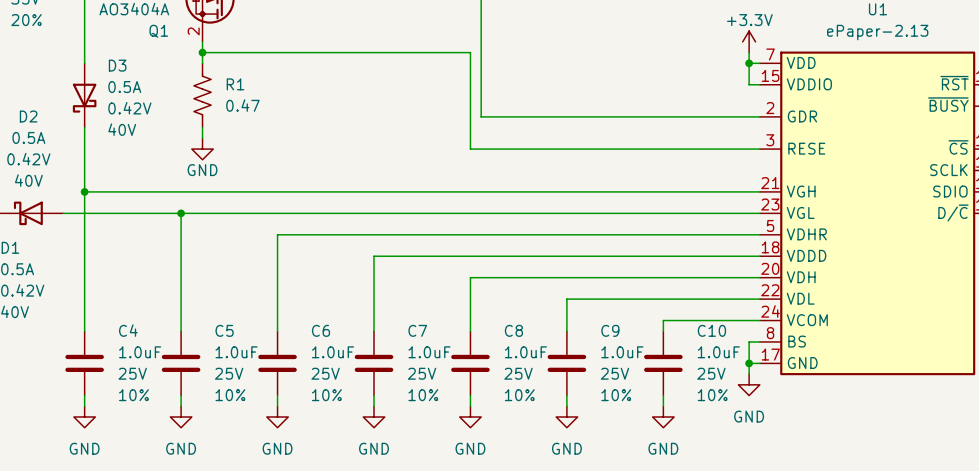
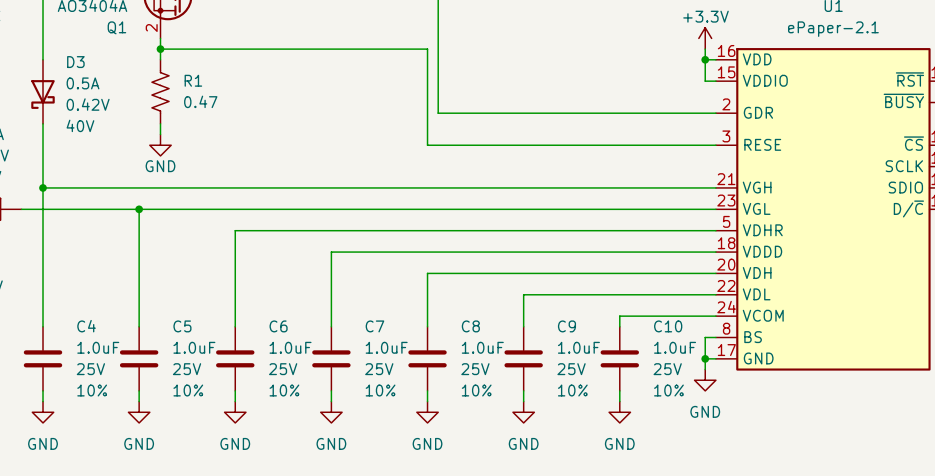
U1 value: ePaper-2.13 (877, 32) -> ePaper-2.1 (833, 29)
U1 pin number: 7 (770, 54) -> 16 (726, 50)

